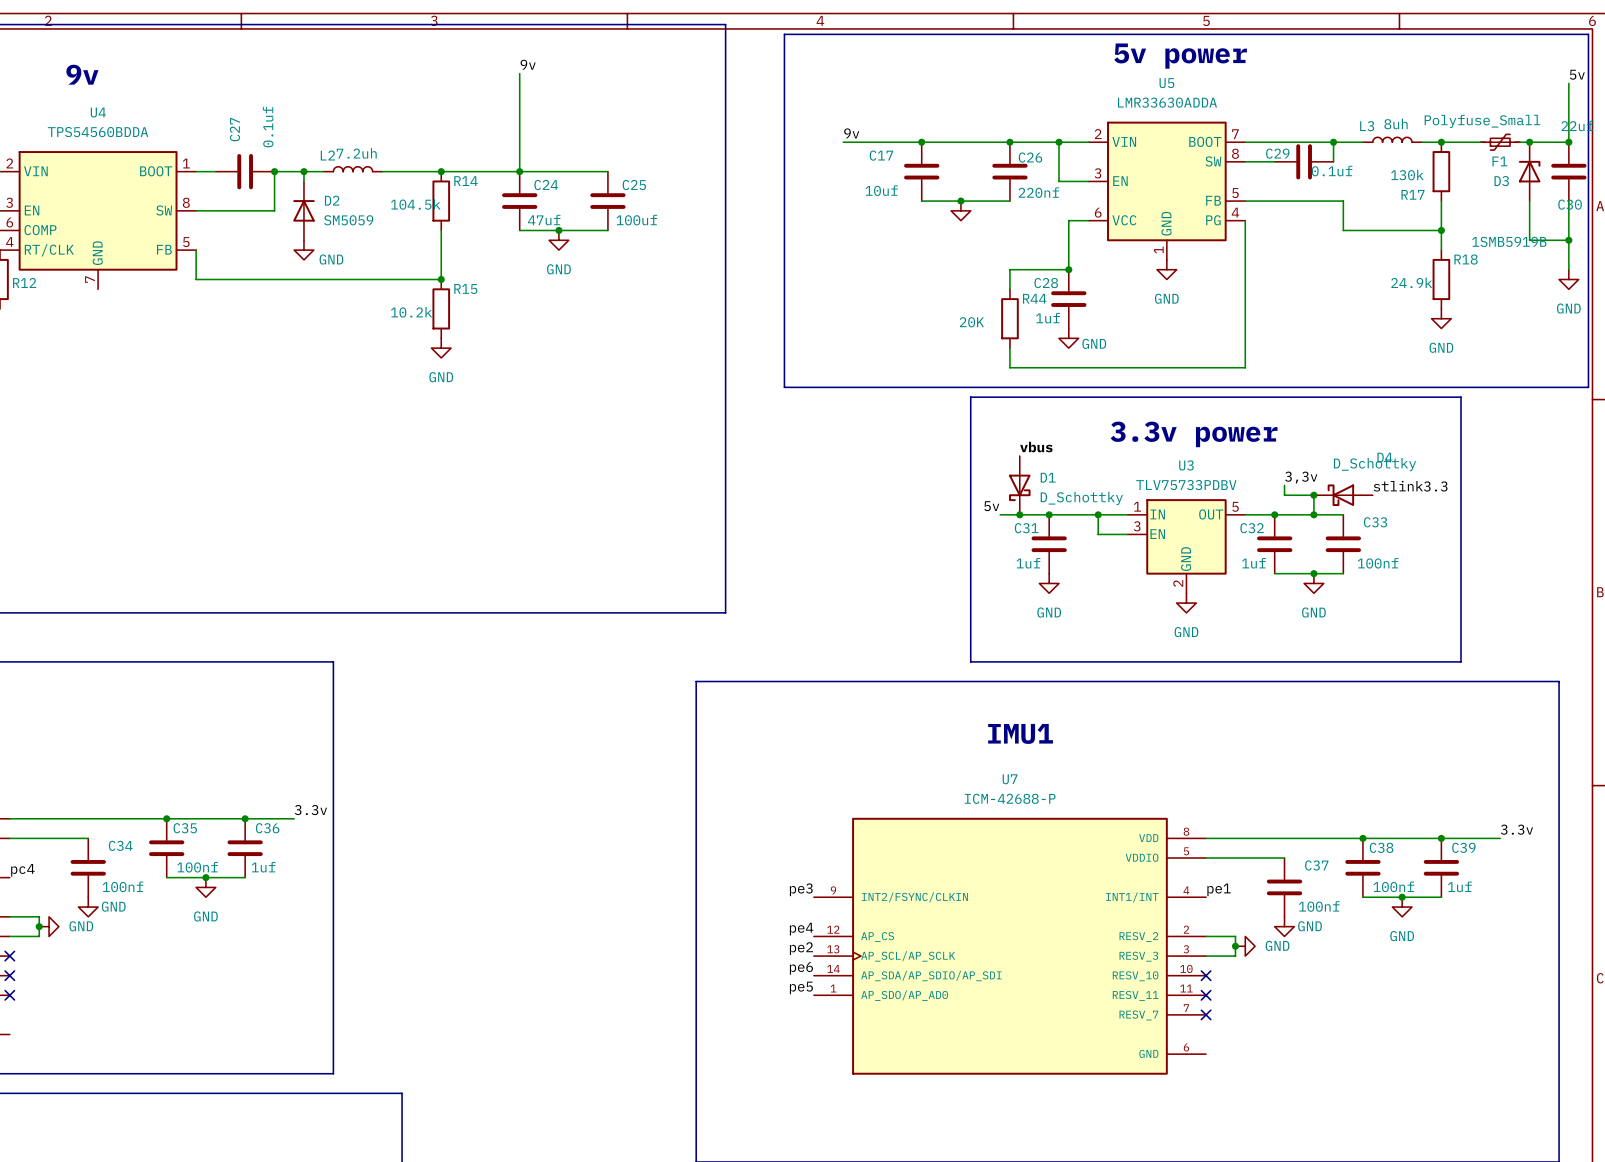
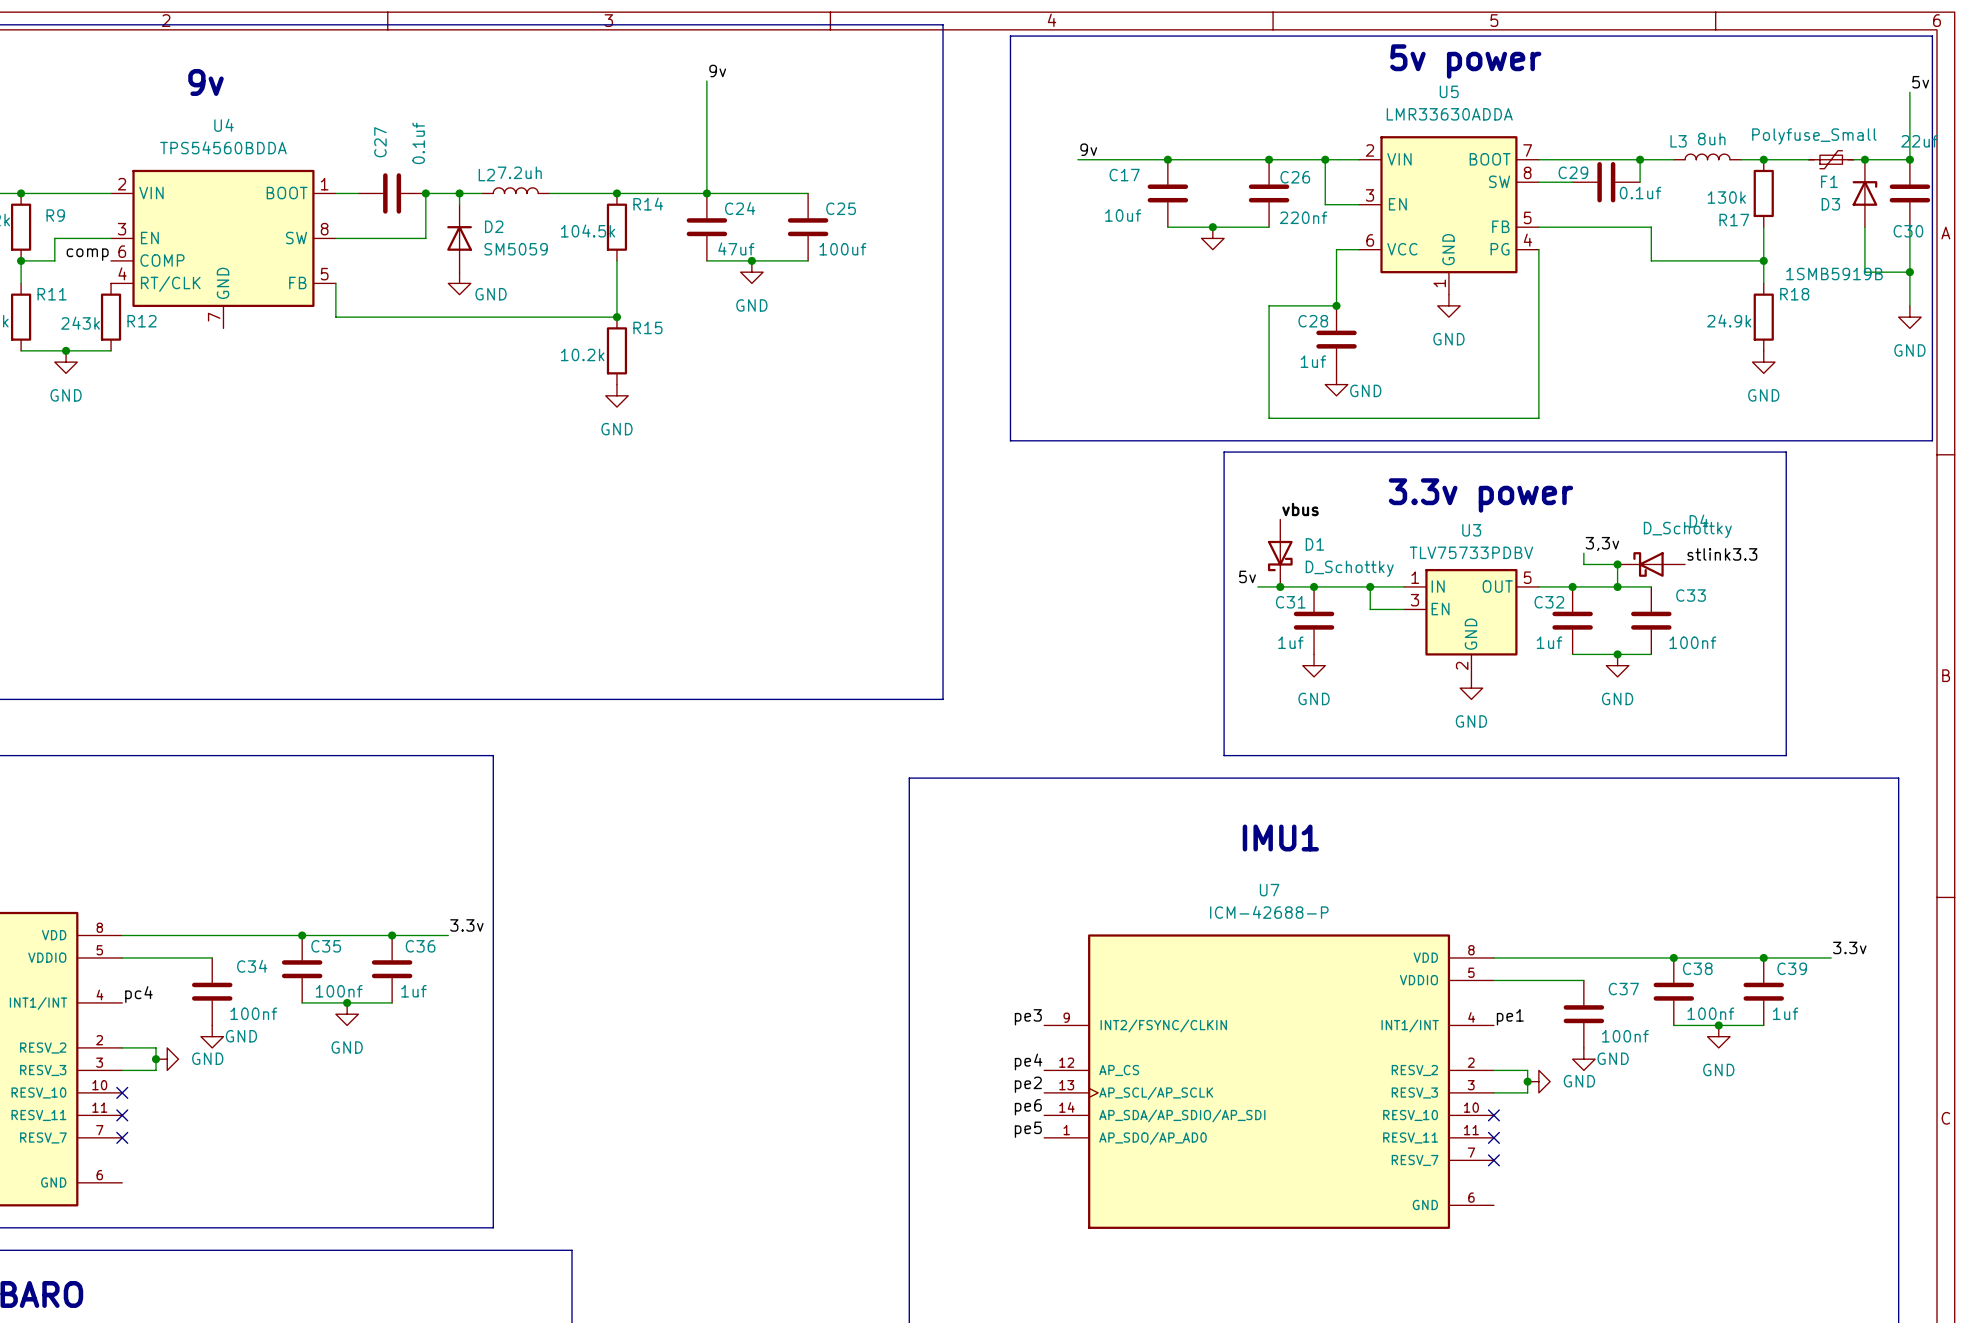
wire: none -> (1269, 328) (1269, 395)
R44: 20K (1009, 318) -> none

